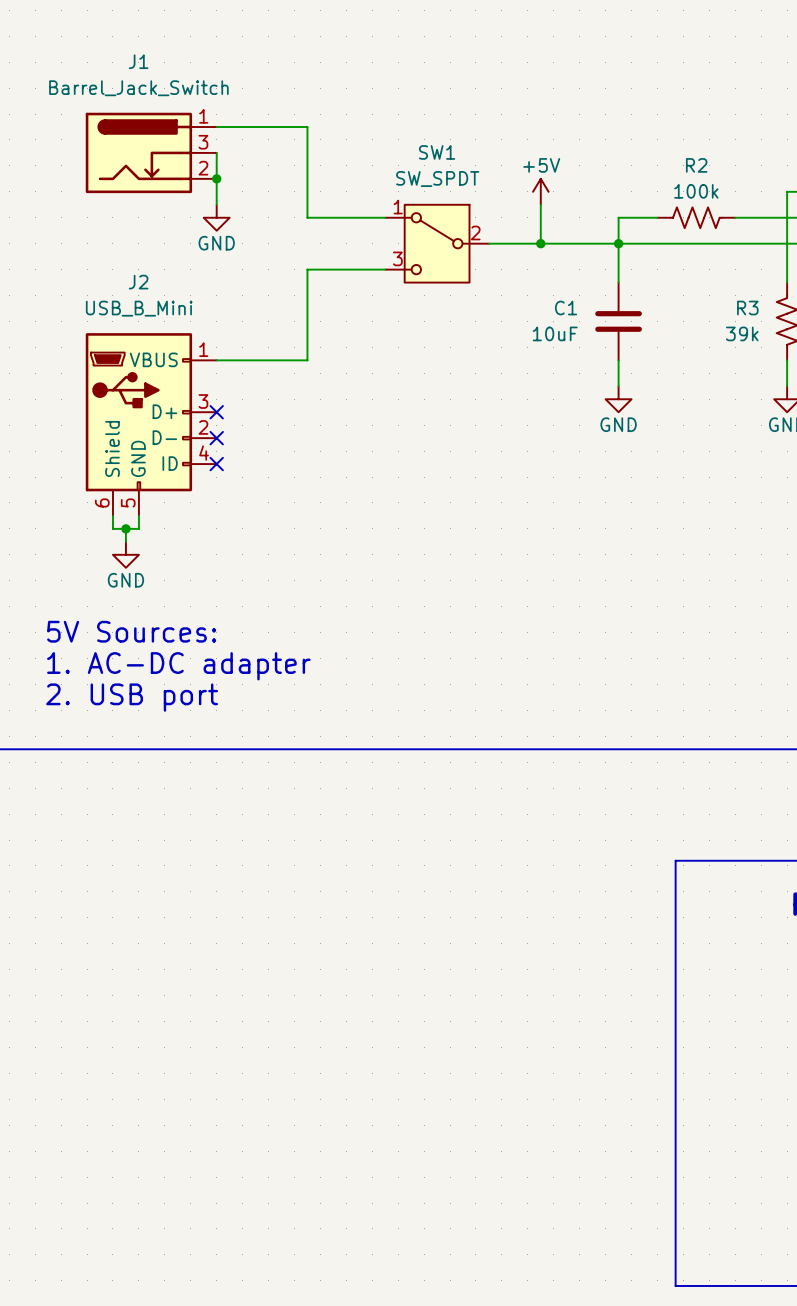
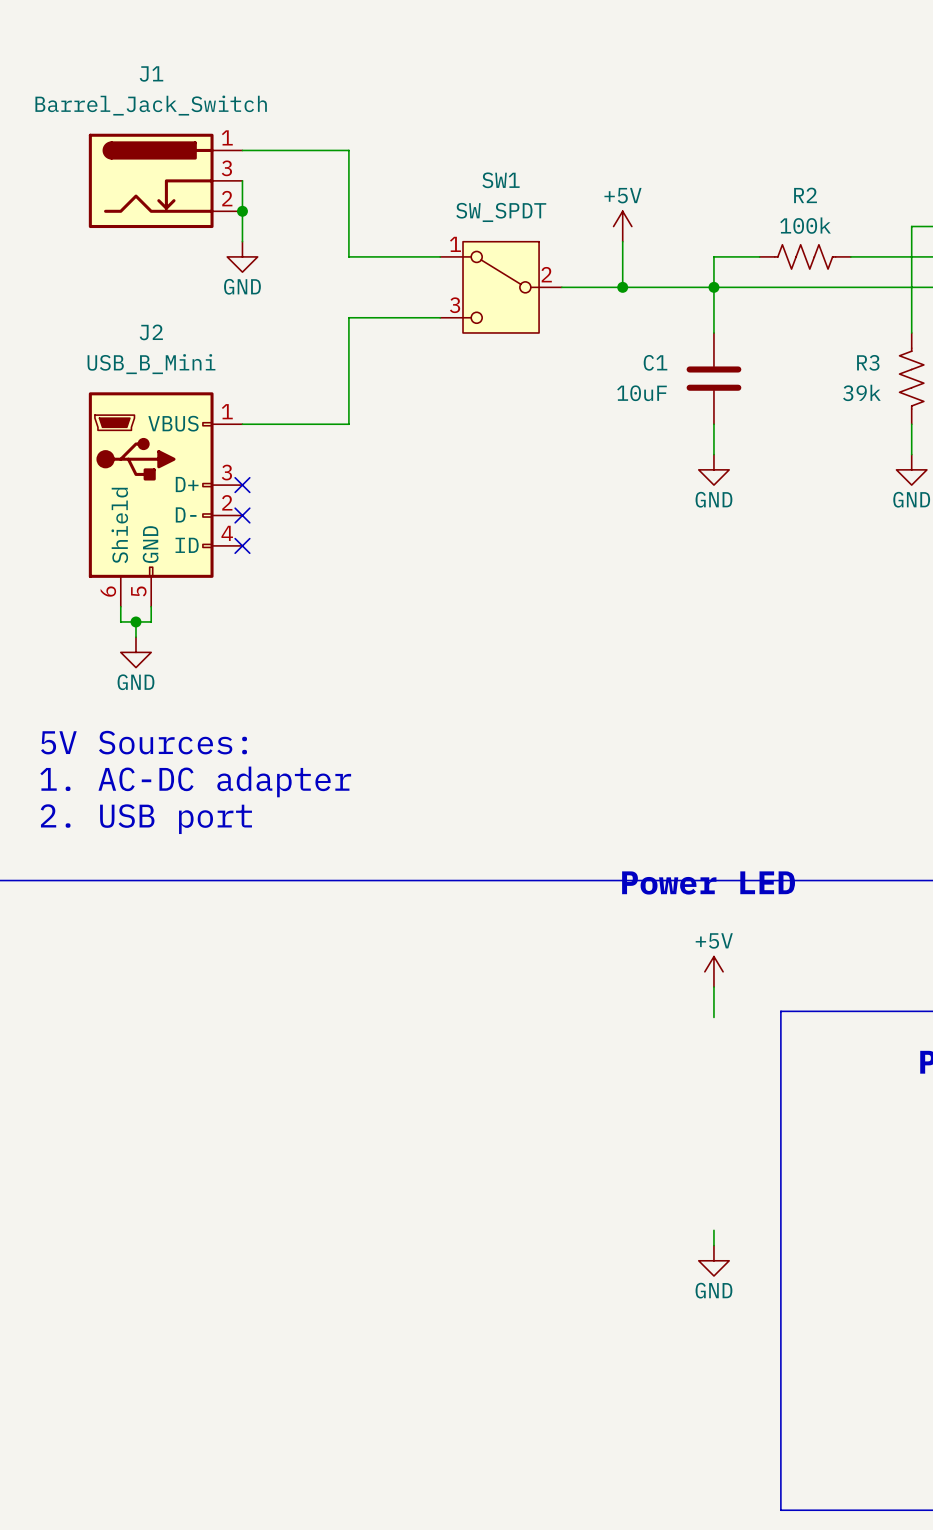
text: none -> Power LED (708, 882)
power symbol: none -> +5V (713, 971)
wire: none -> (713, 987) (713, 1017)
wire: none -> (713, 1230) (713, 1245)
power symbol: none -> GND (713, 1260)

